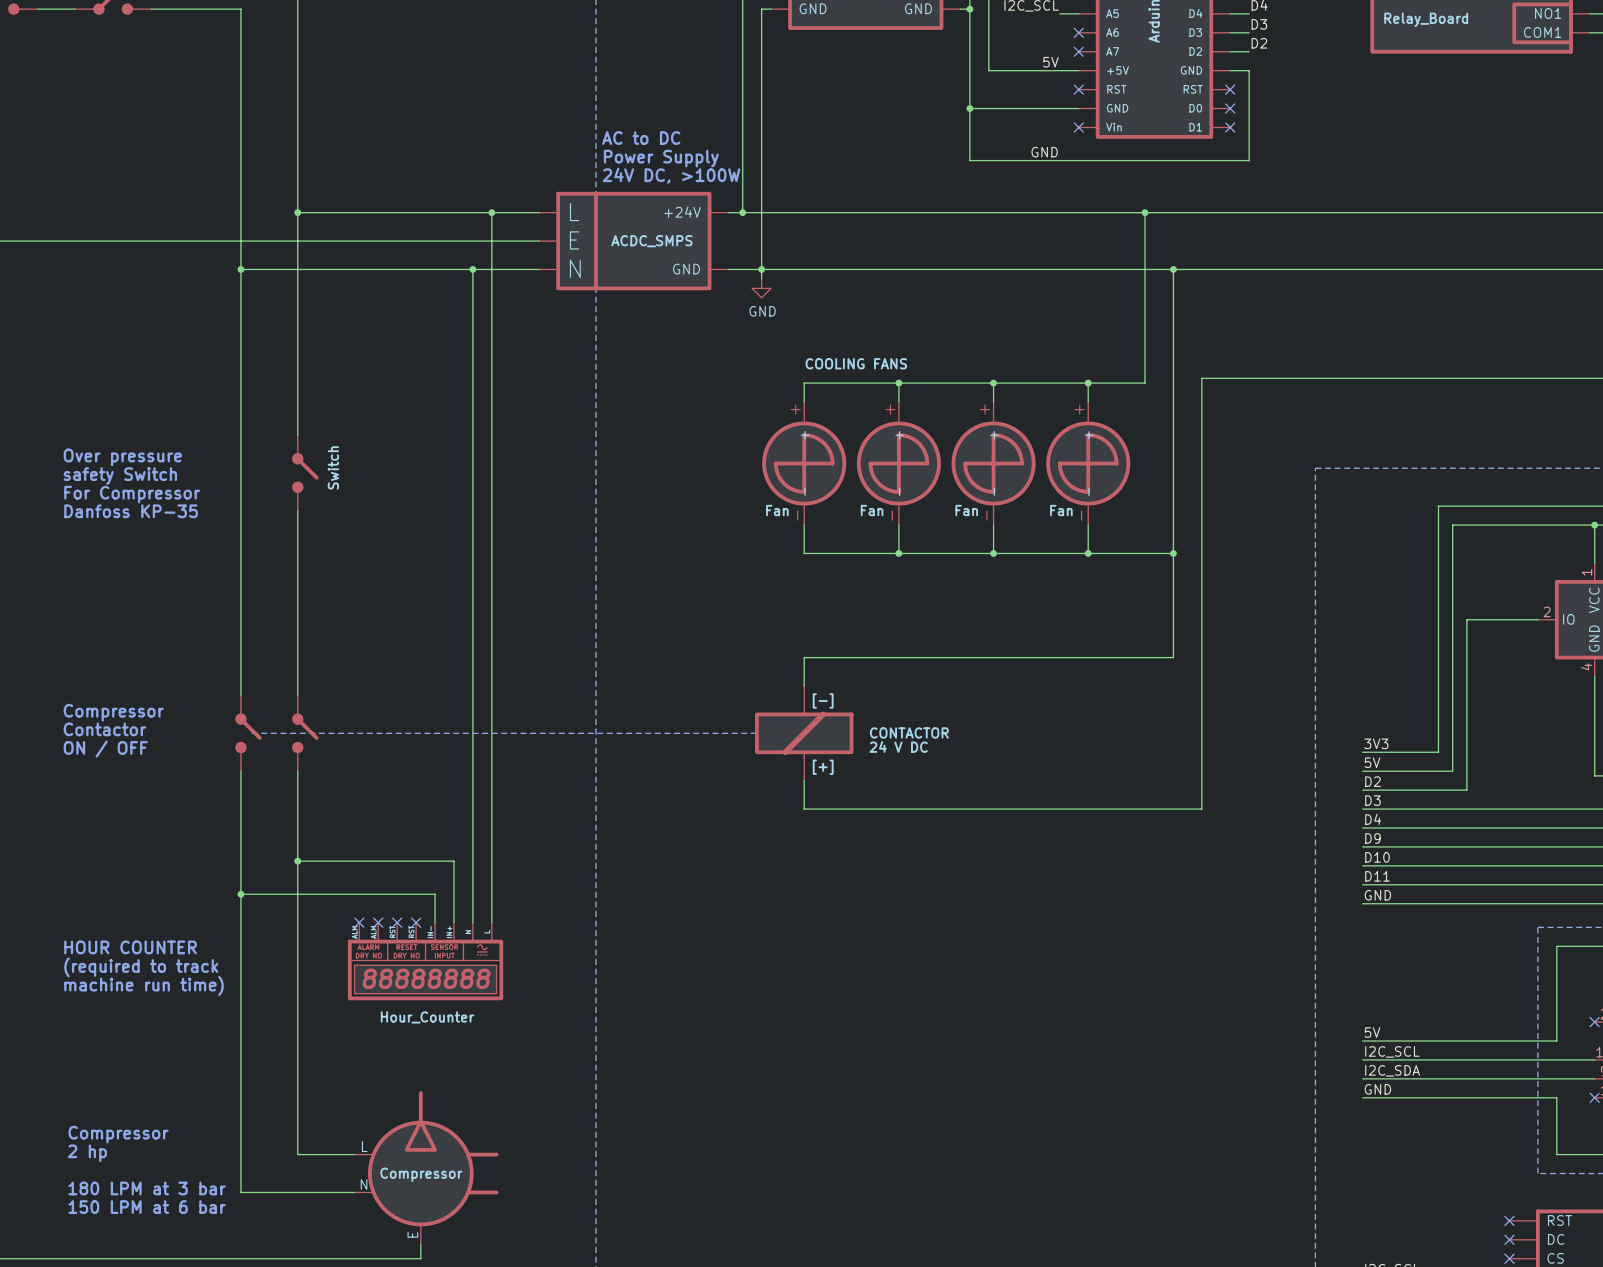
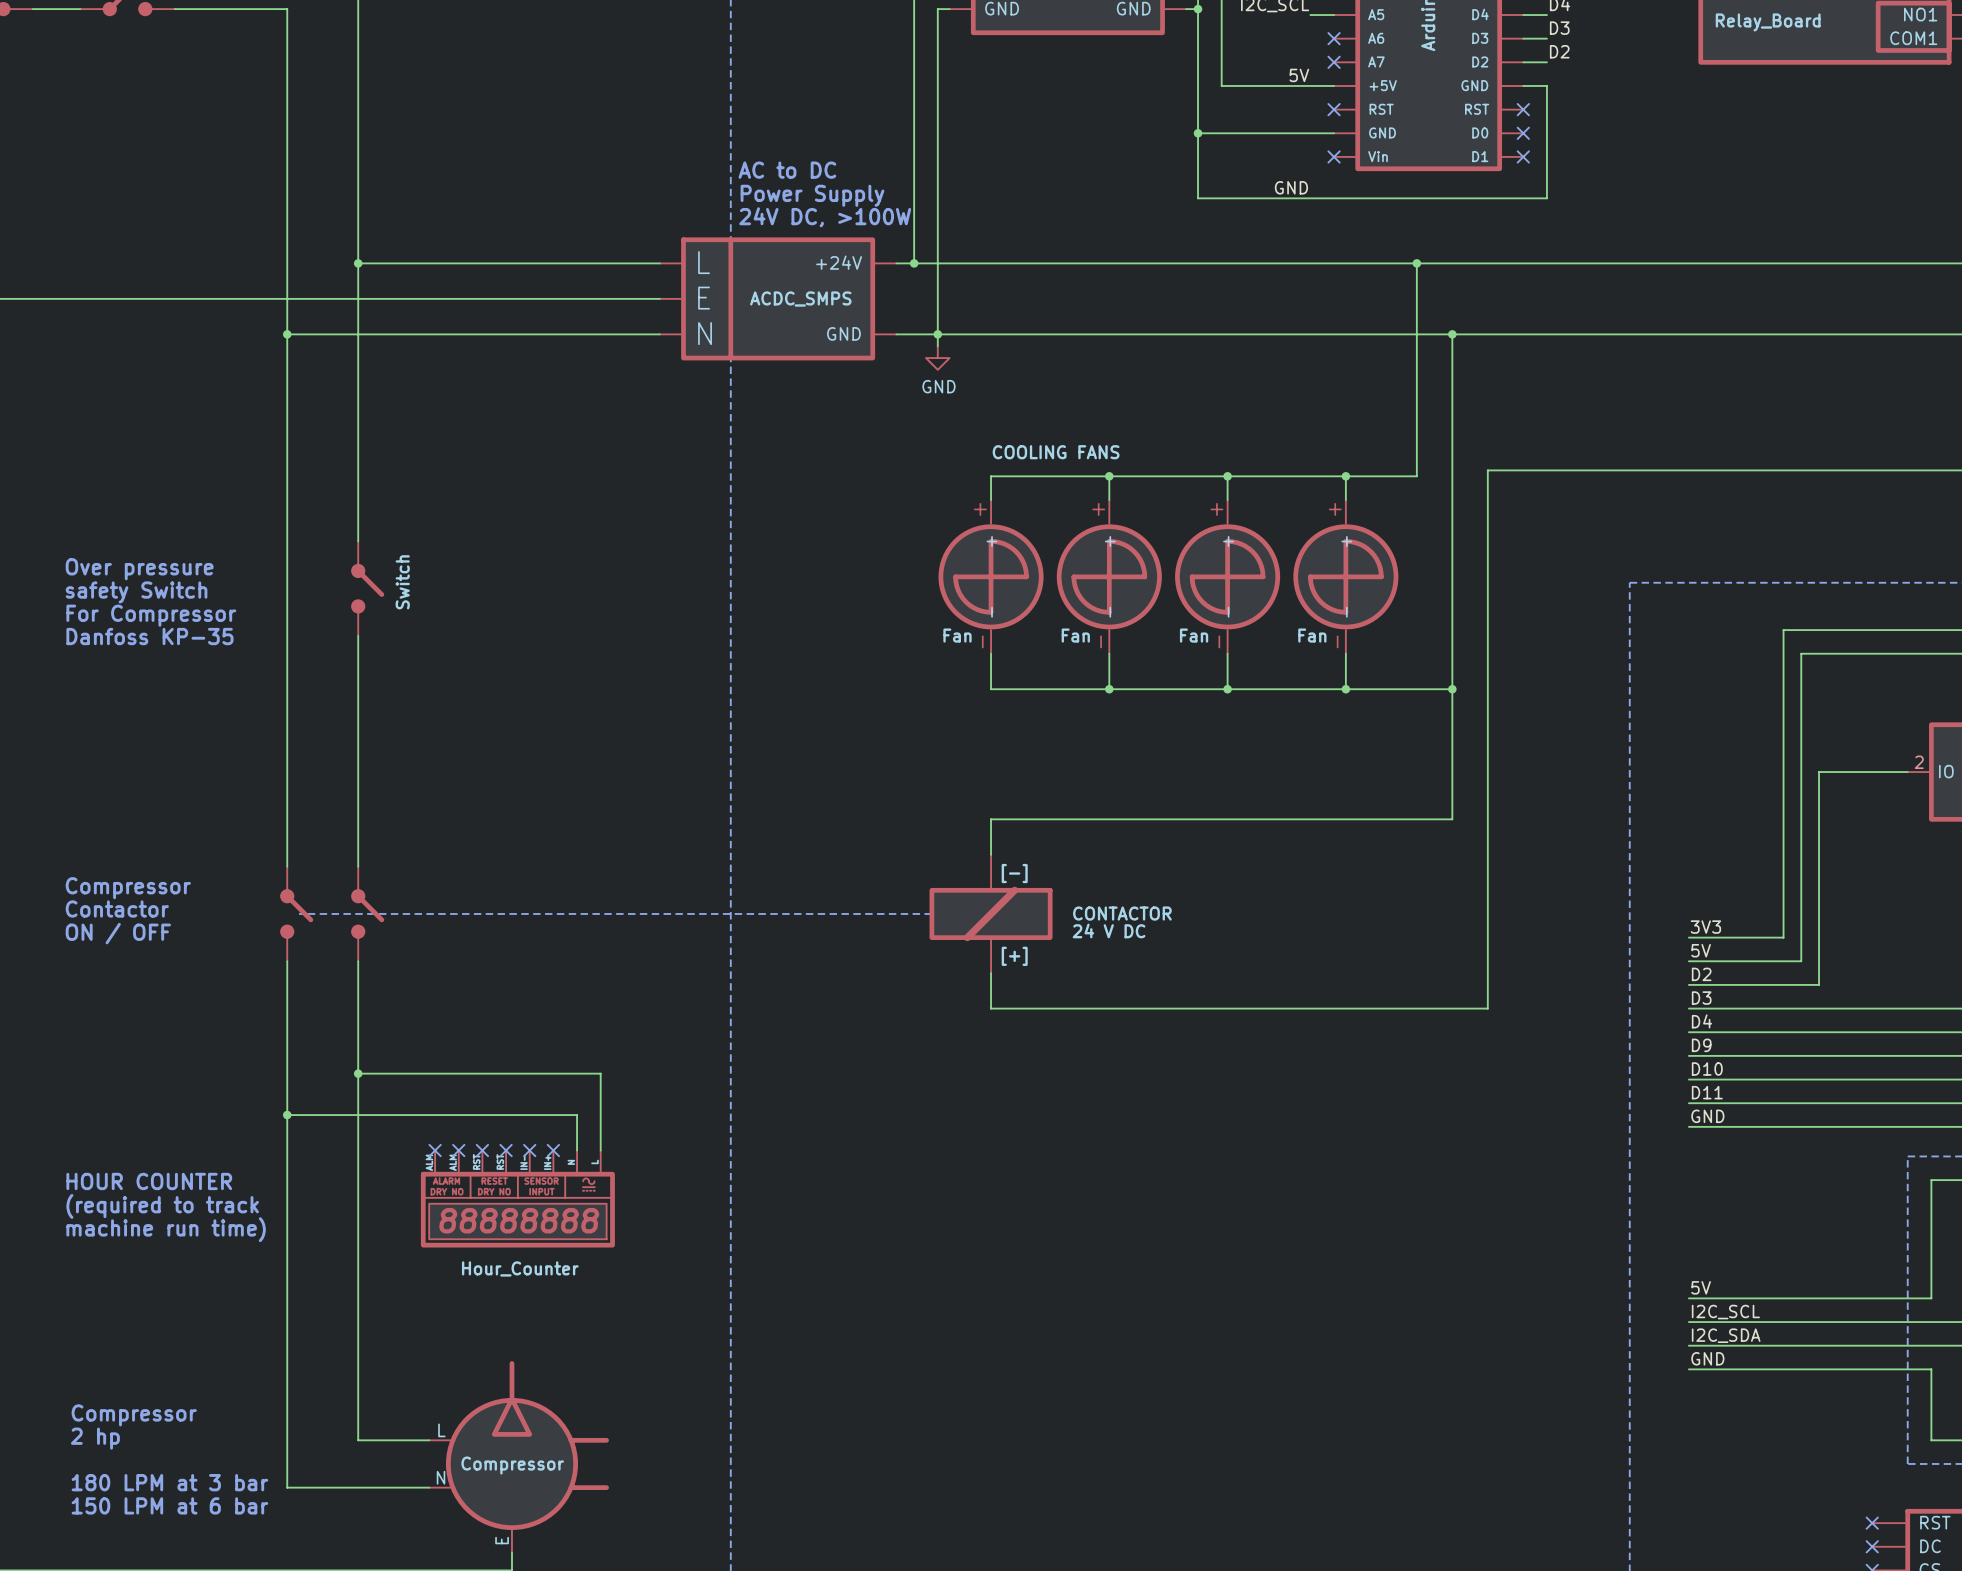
wire: (491, 212) (491, 861) -> none
junction: (491, 212) -> none
wire: (472, 269) (472, 894) -> none
junction: (472, 269) -> none
wire: (453, 861) (453, 922) -> (553, 1073) (600, 1073)
wire: (435, 894) (435, 922) -> (529, 1115) (577, 1115)
no-connect mark: none -> (529, 1150)
no-connect mark: none -> (553, 1150)

